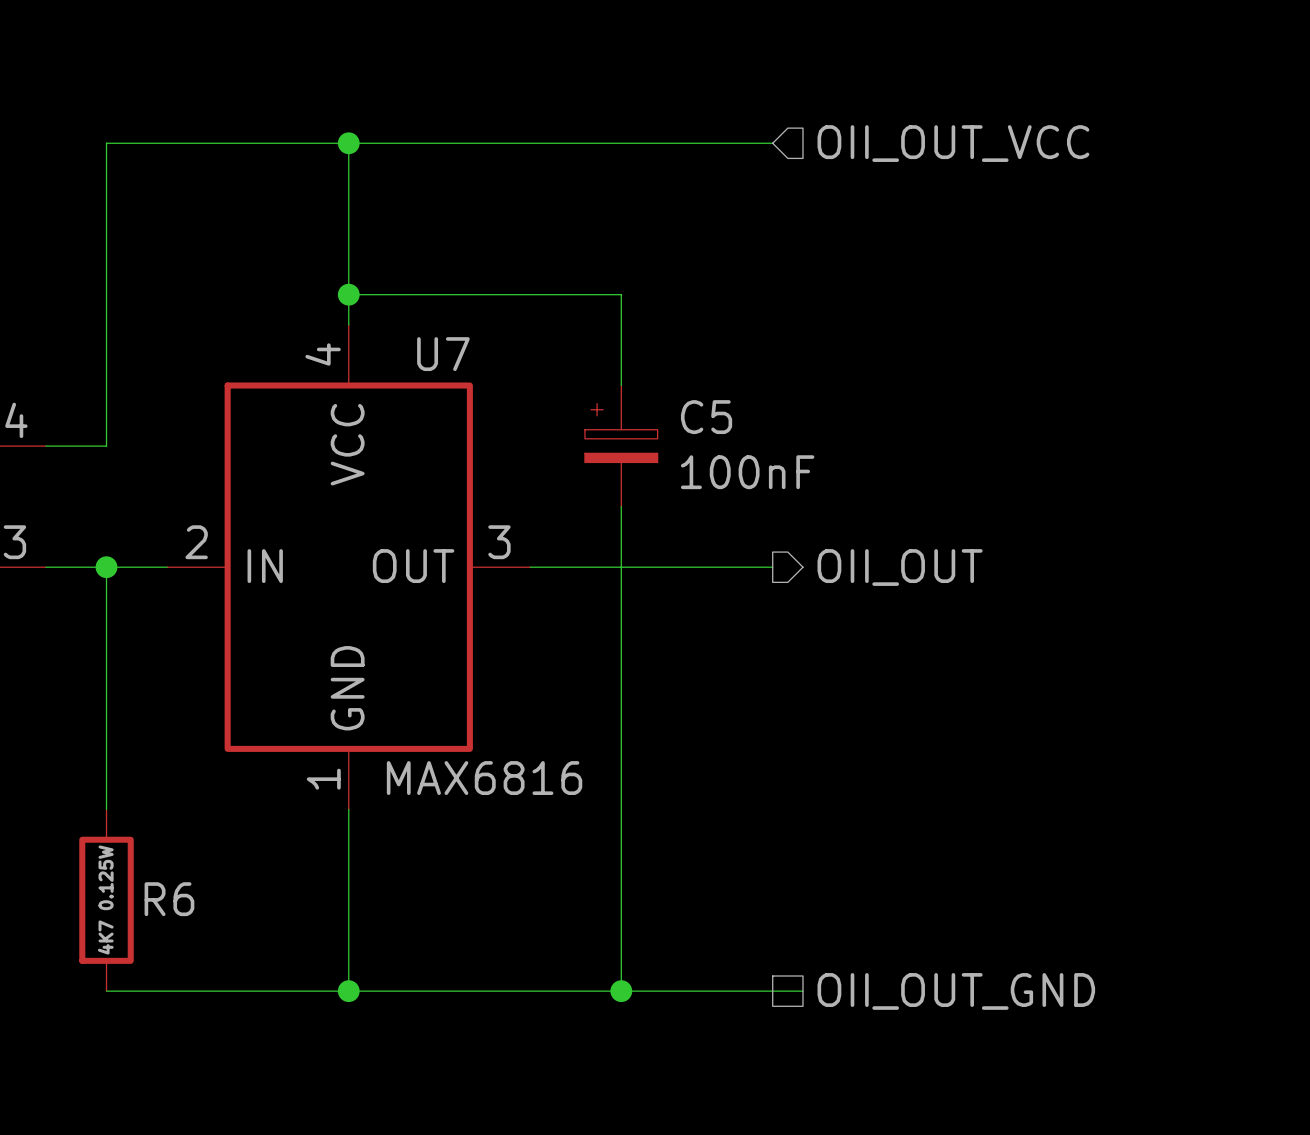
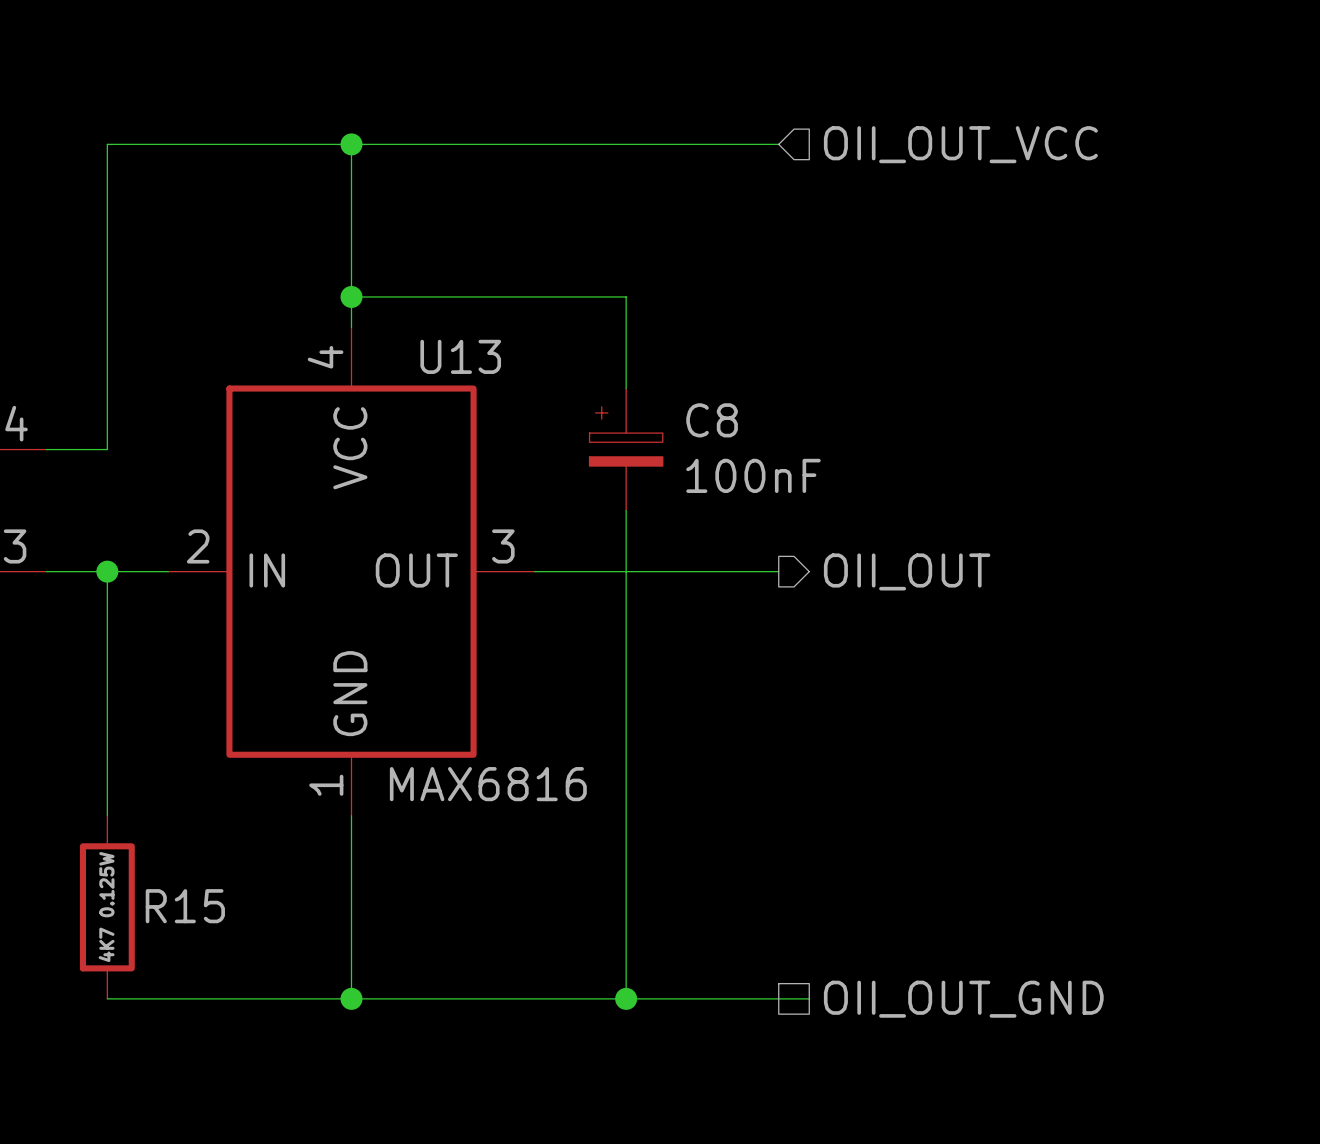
U7 name: U7 (443, 354) -> U13 (460, 356)
C5 name: C5 (706, 417) -> C8 (712, 420)
R6 name: R6 (169, 899) -> R15 (185, 906)

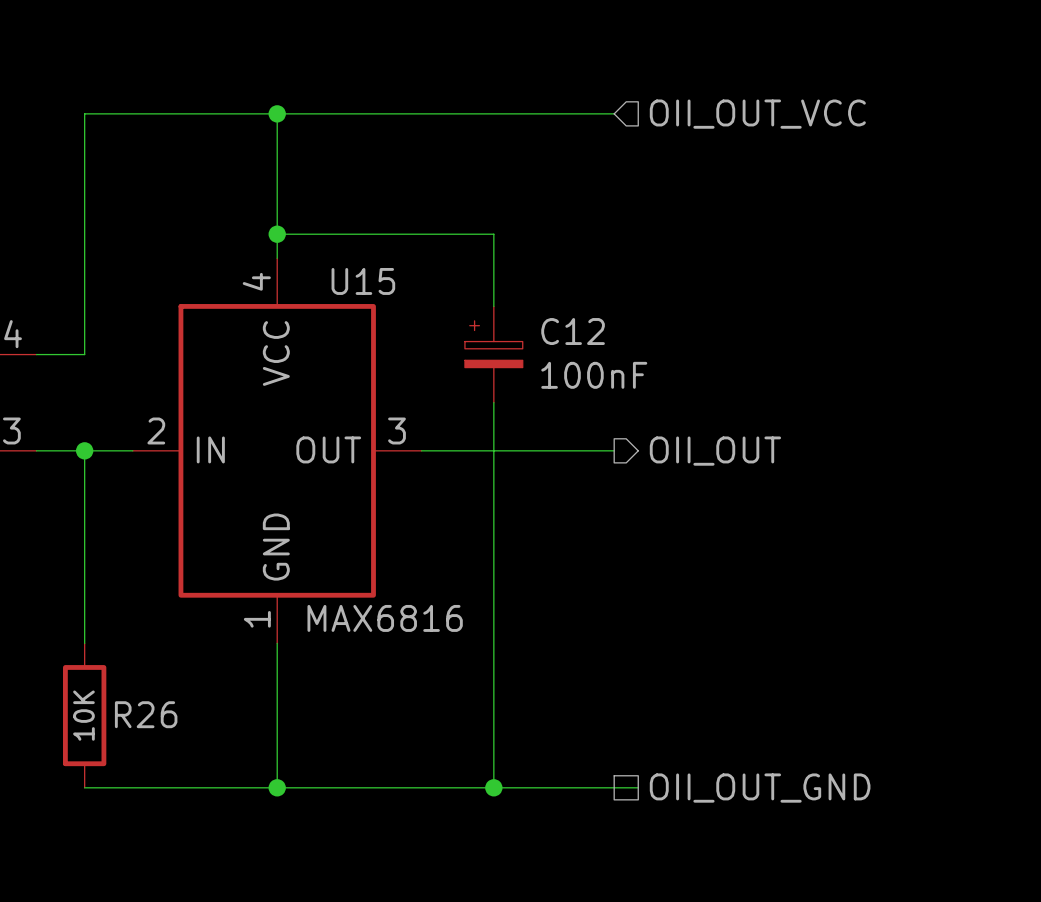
U13 name: U13 (460, 356) -> U15 (363, 281)
C8 name: C8 (712, 420) -> C12 (573, 331)
R15 name: R15 (185, 906) -> R26 (146, 714)
R15 value: 4K7 0.125W (106, 907) -> 10K (83, 715)

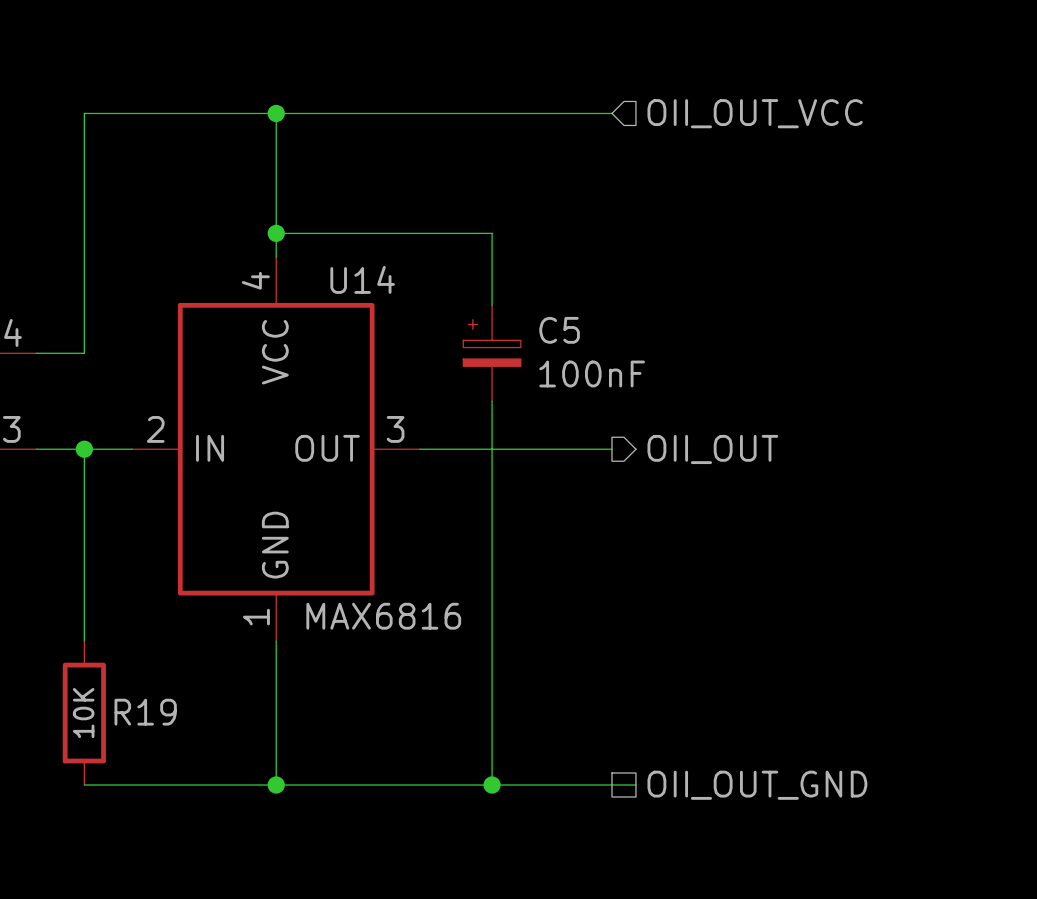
U15 name: U15 (363, 281) -> U14 (362, 279)
C12 name: C12 (573, 331) -> C5 (559, 330)
R26 name: R26 (146, 714) -> R19 (145, 712)

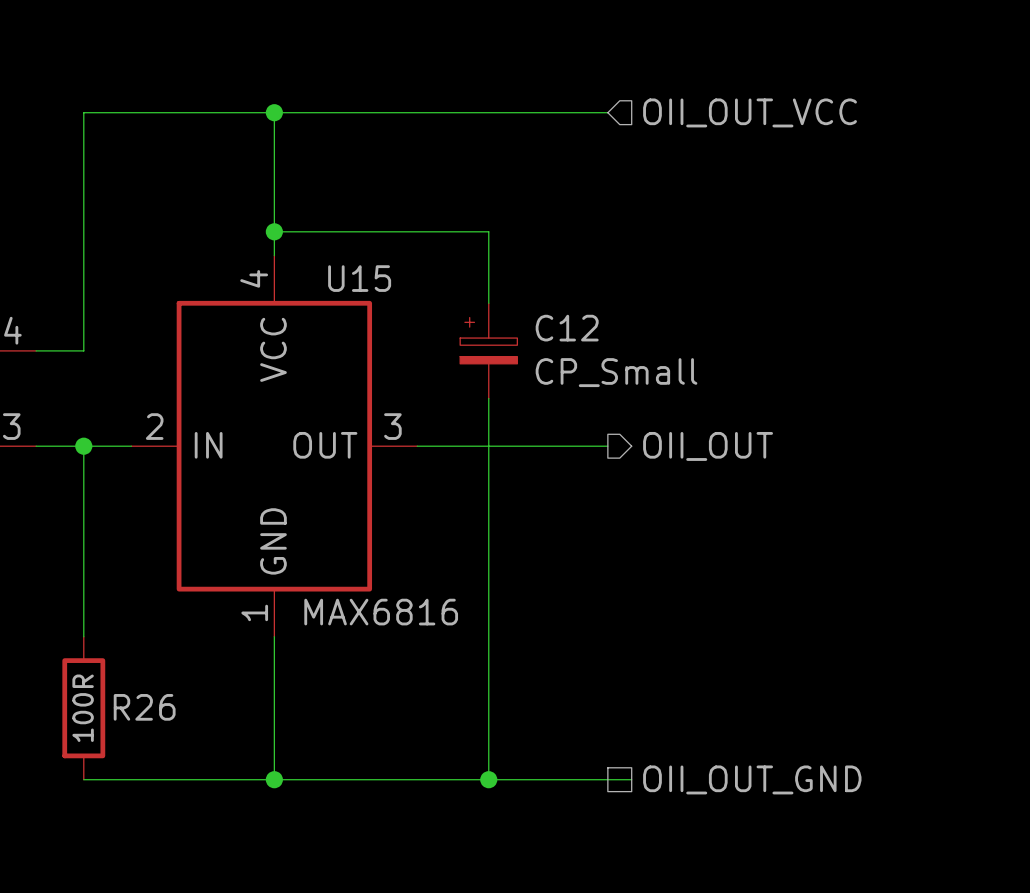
U14 name: U14 (362, 279) -> U15 (359, 278)
C5 name: C5 (559, 330) -> C12 (567, 328)
C5 value: 100nF (592, 373) -> CP_Small (616, 372)
R19 name: R19 (145, 712) -> R26 (144, 707)
R19 value: 10K (83, 713) -> 100R (83, 708)

